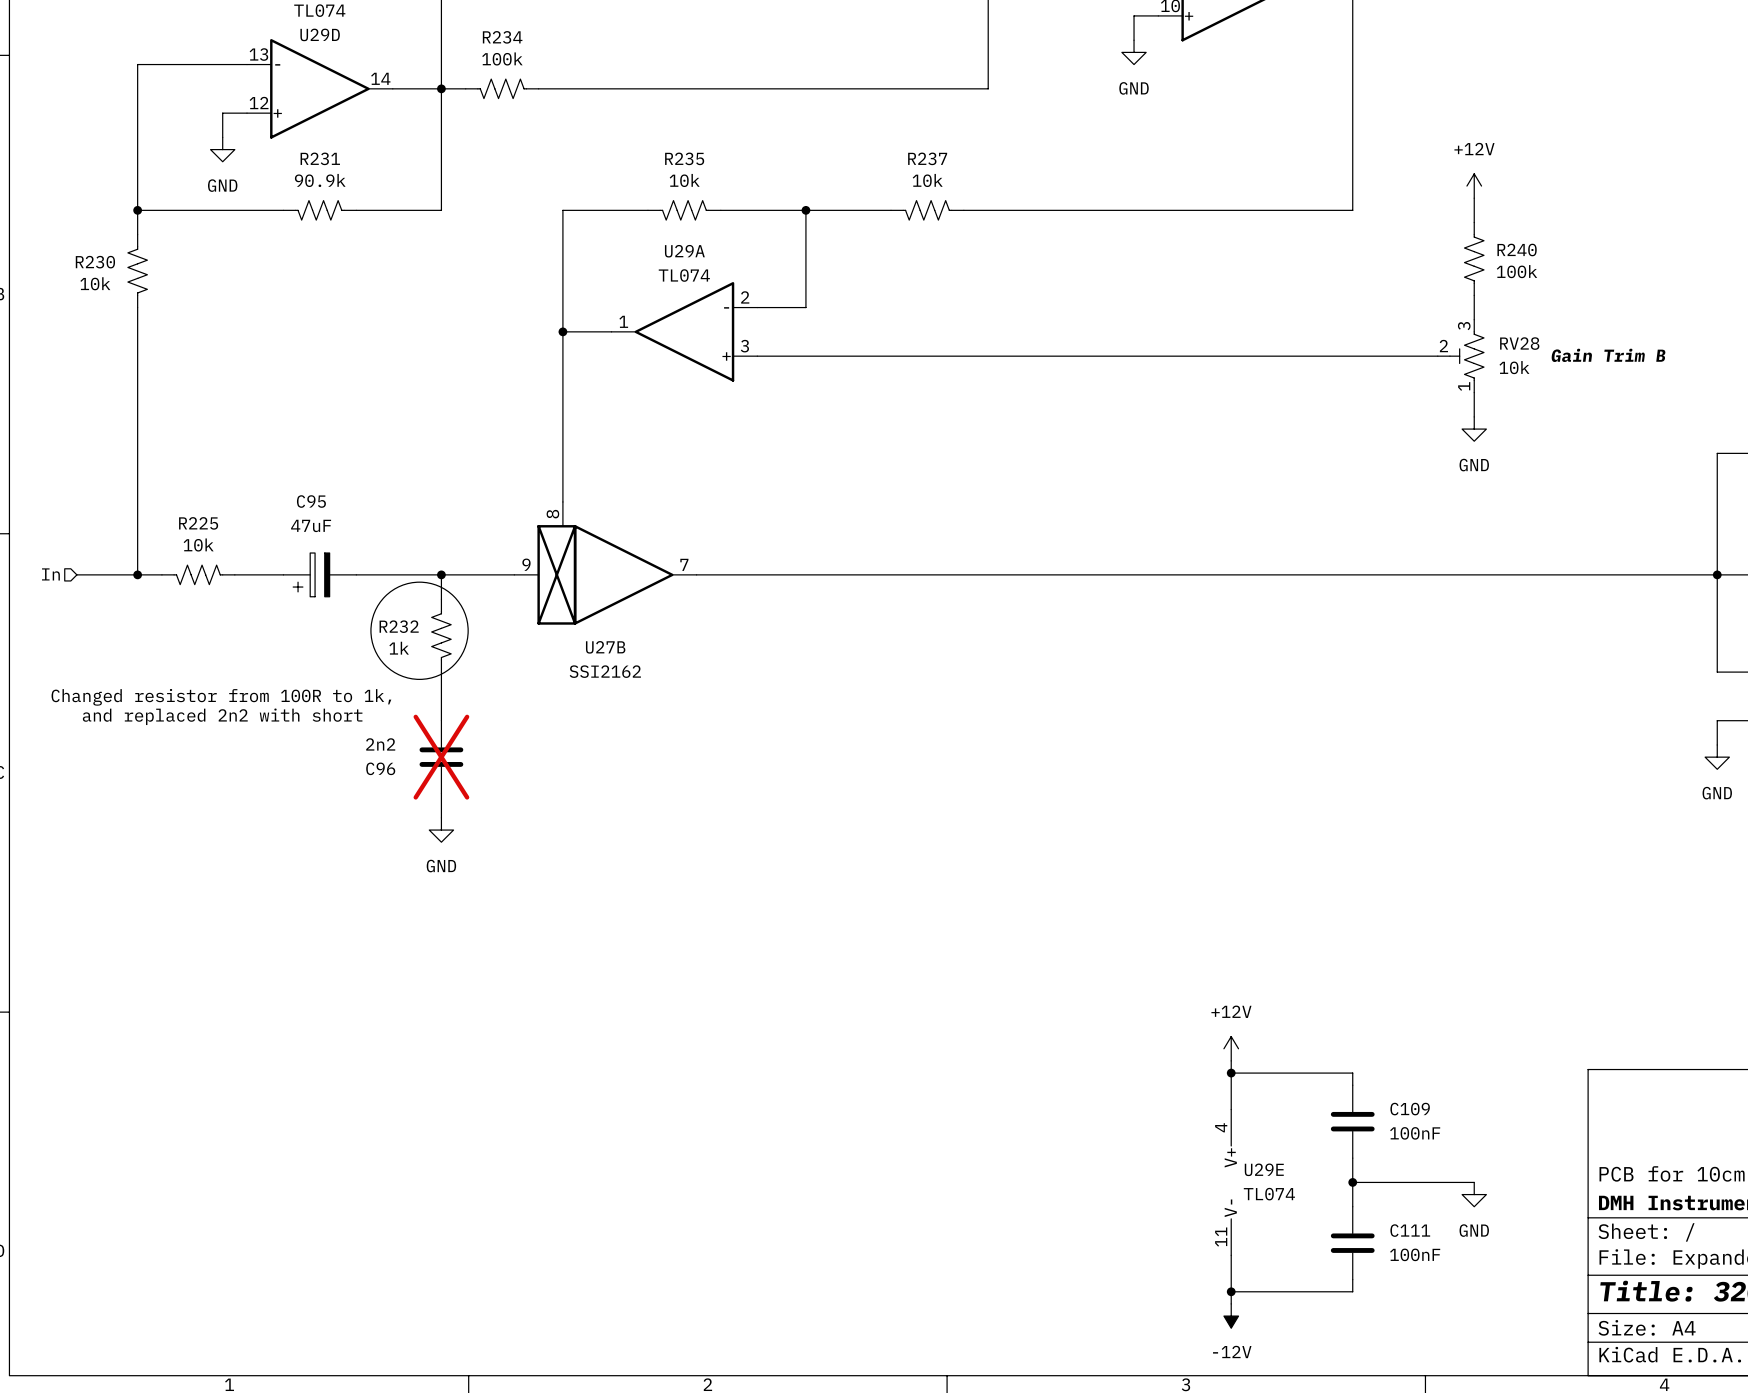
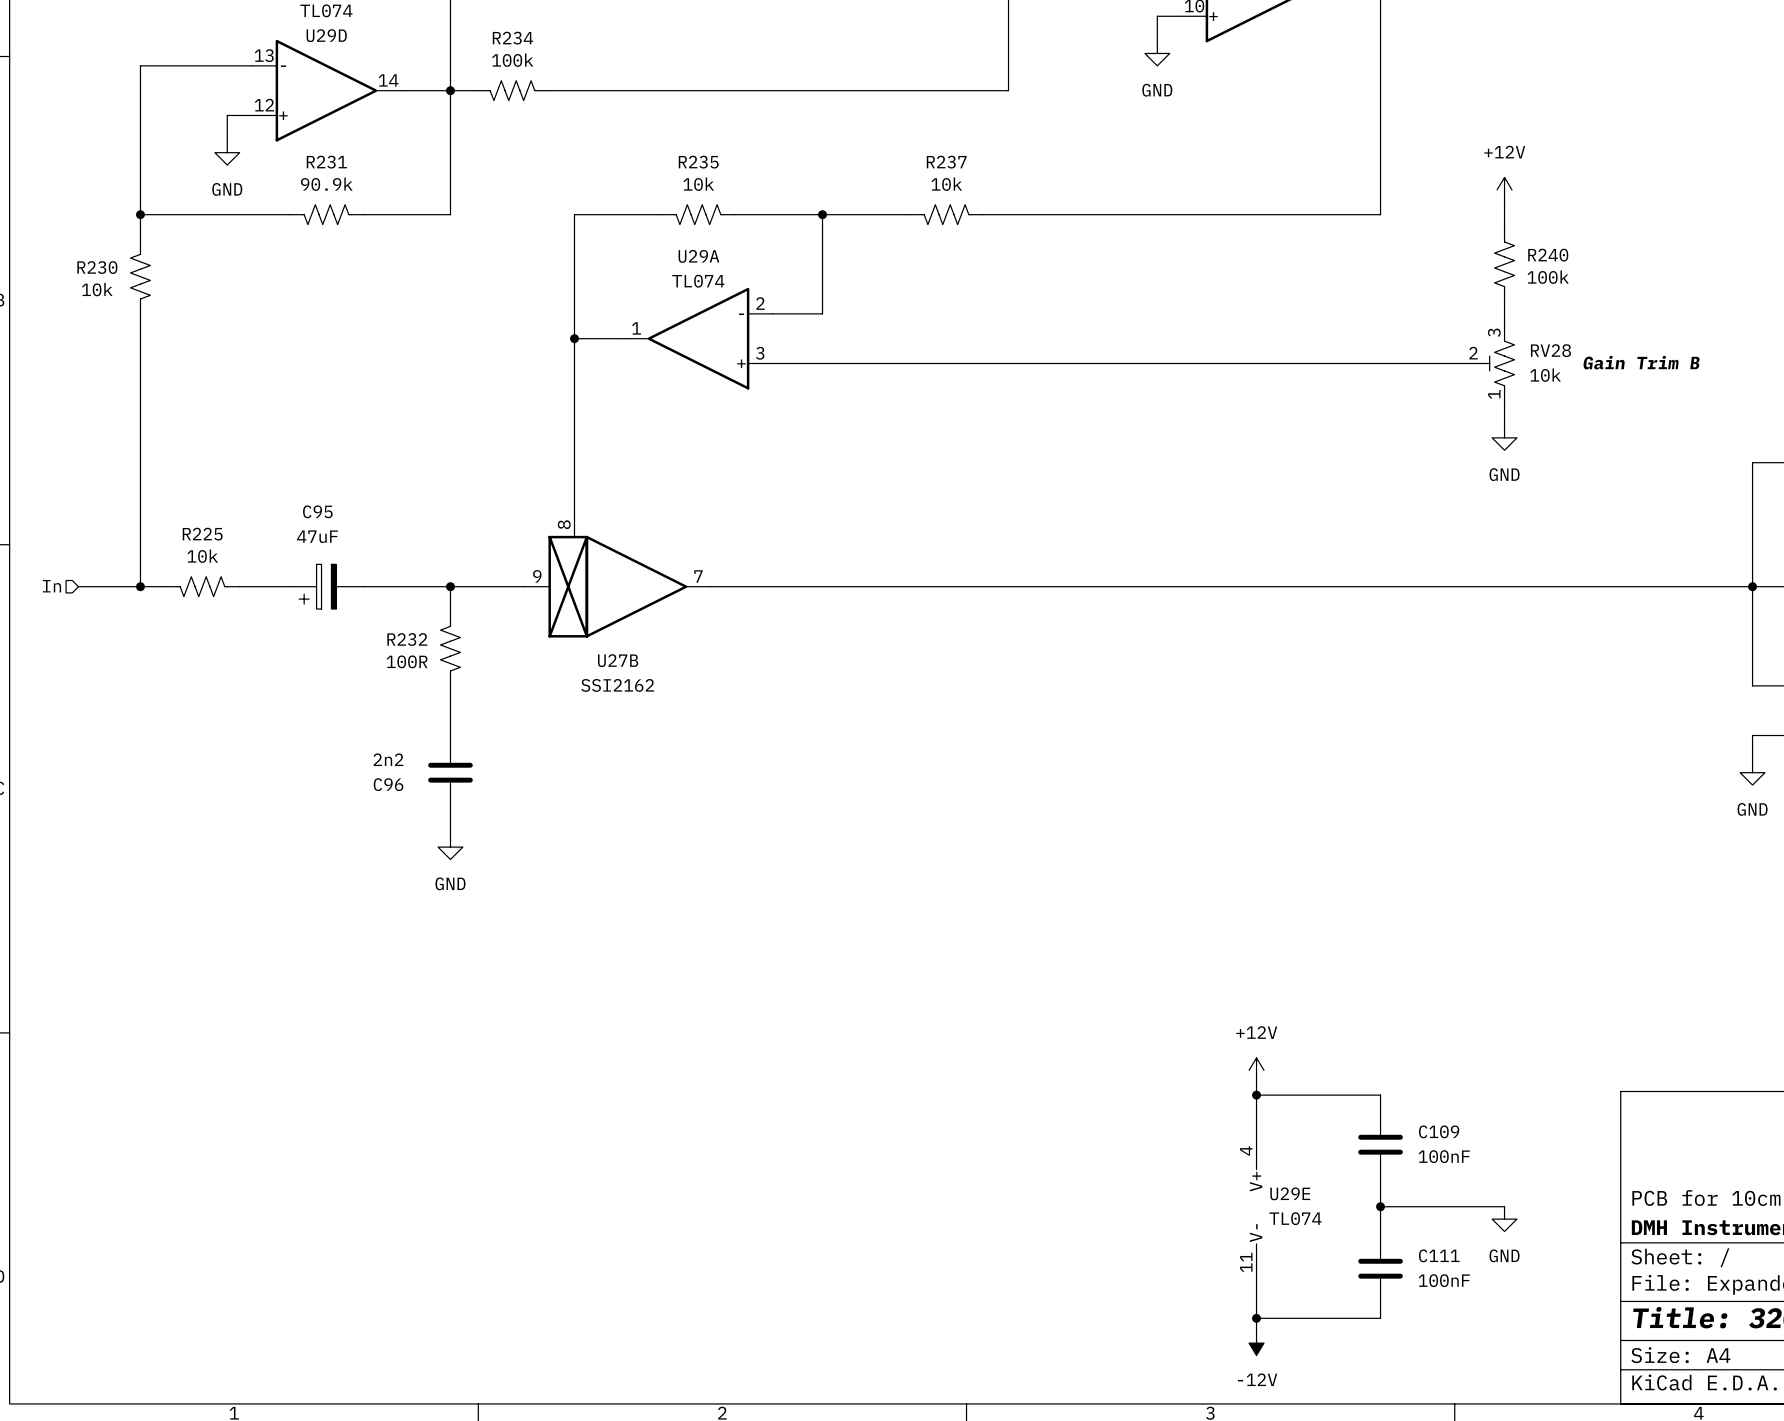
drawing: [370, 582, 469, 680] -> none
R232 value: 1k (399, 648) -> 100R (407, 661)
text: Changed resistor from 100R to 1k, (221, 697) -> none
text: and replaced 2n2 with short (222, 716) -> none
C96 do-not-place cross: (441, 757) -> none

